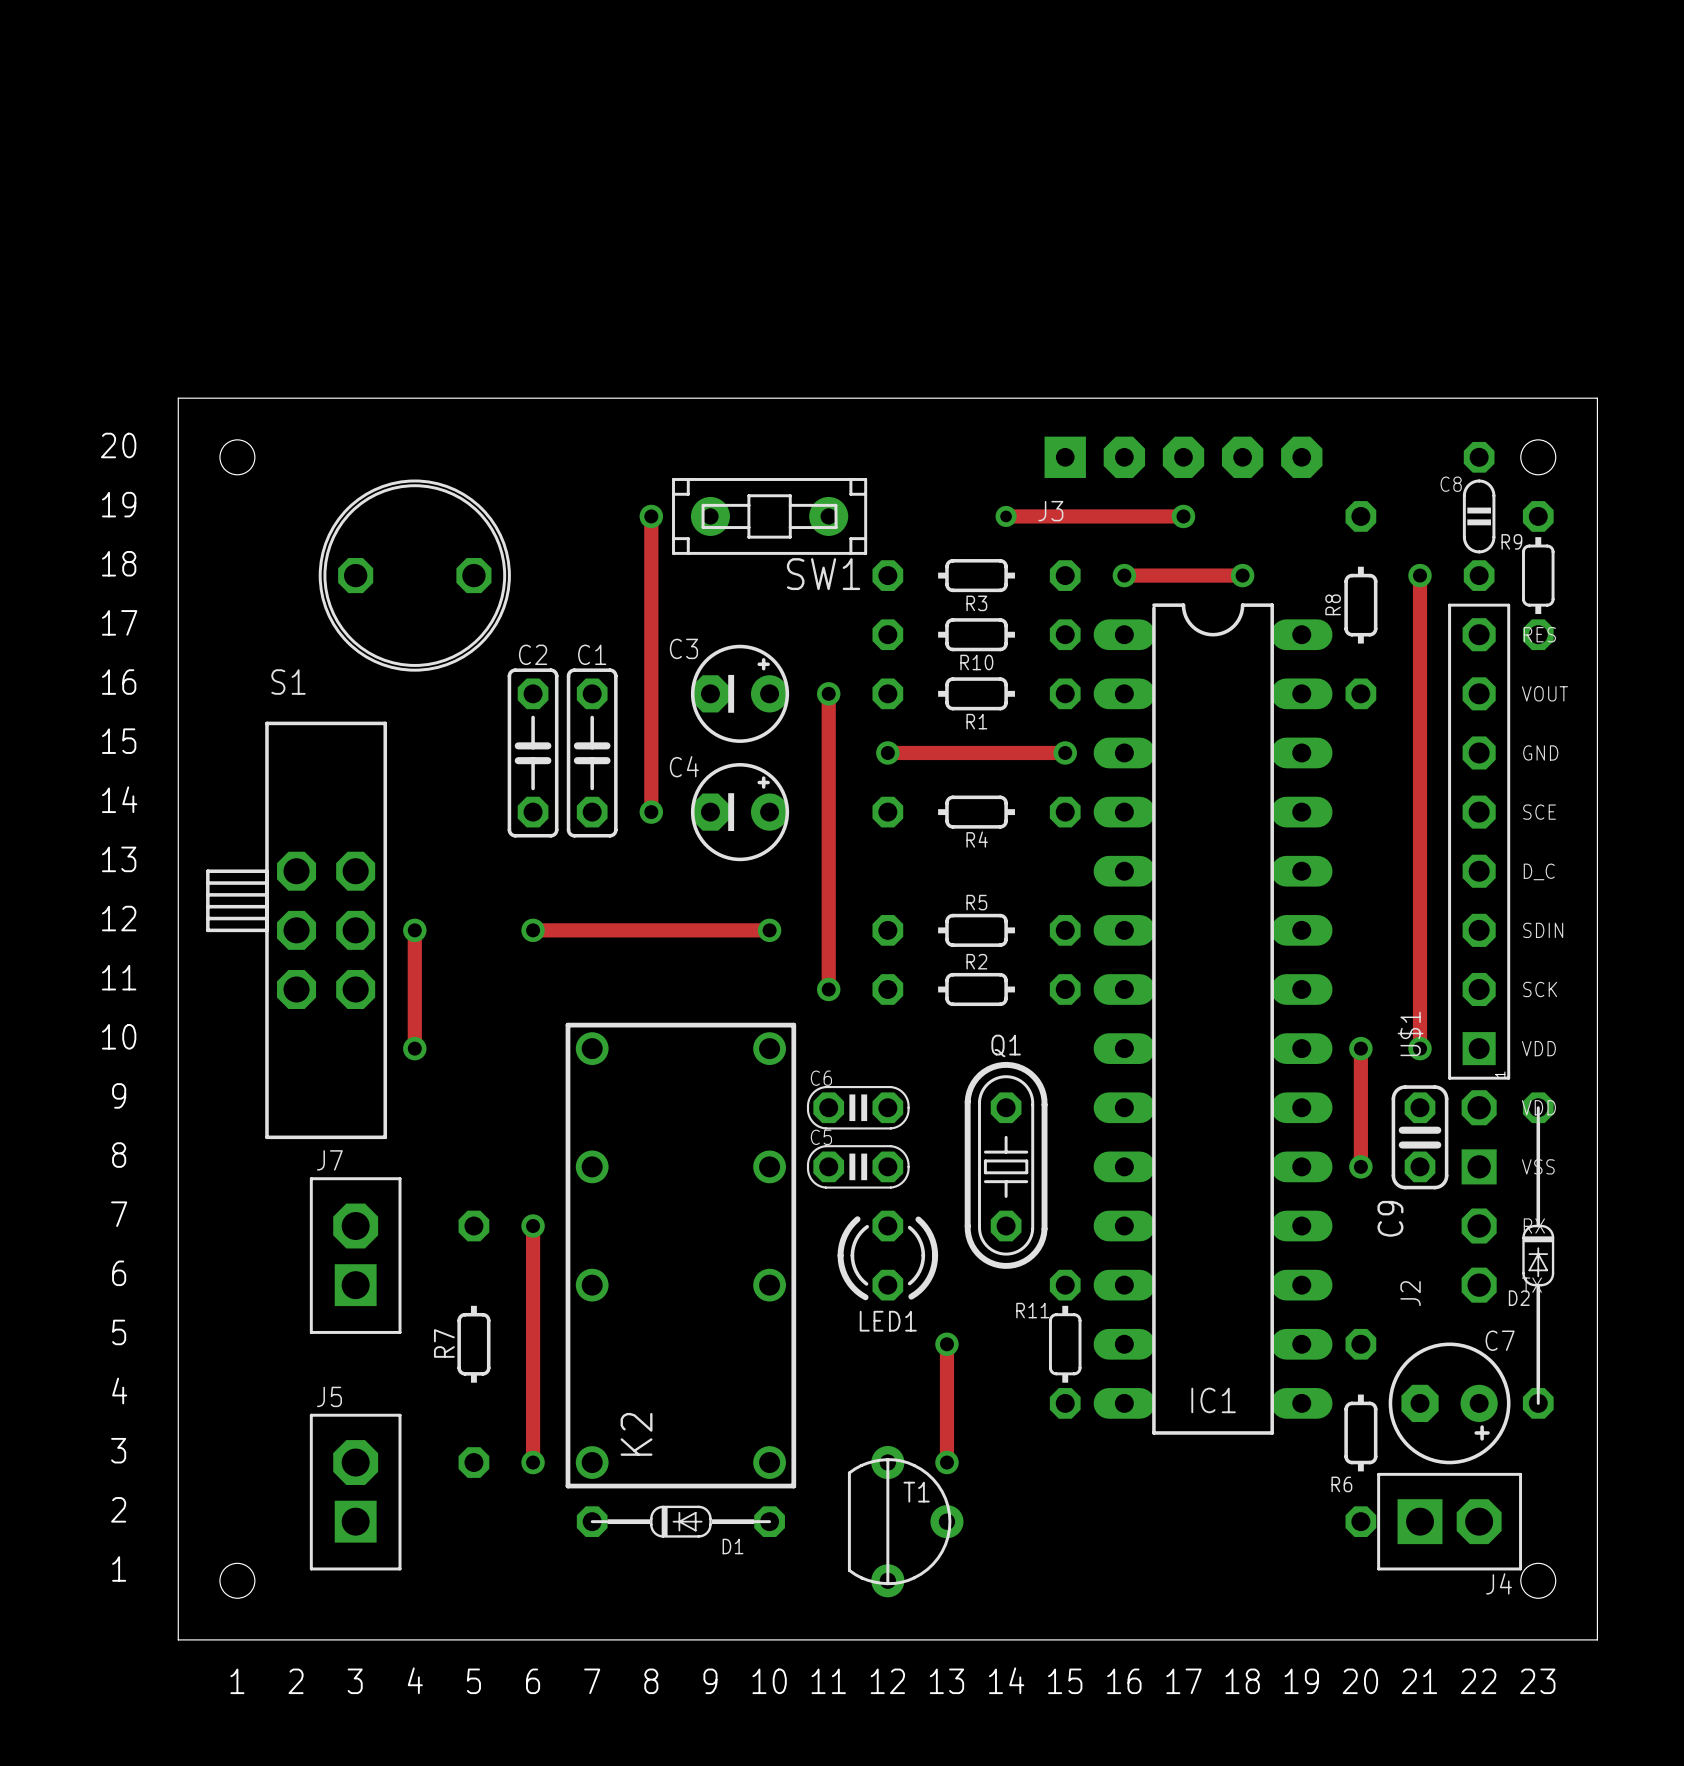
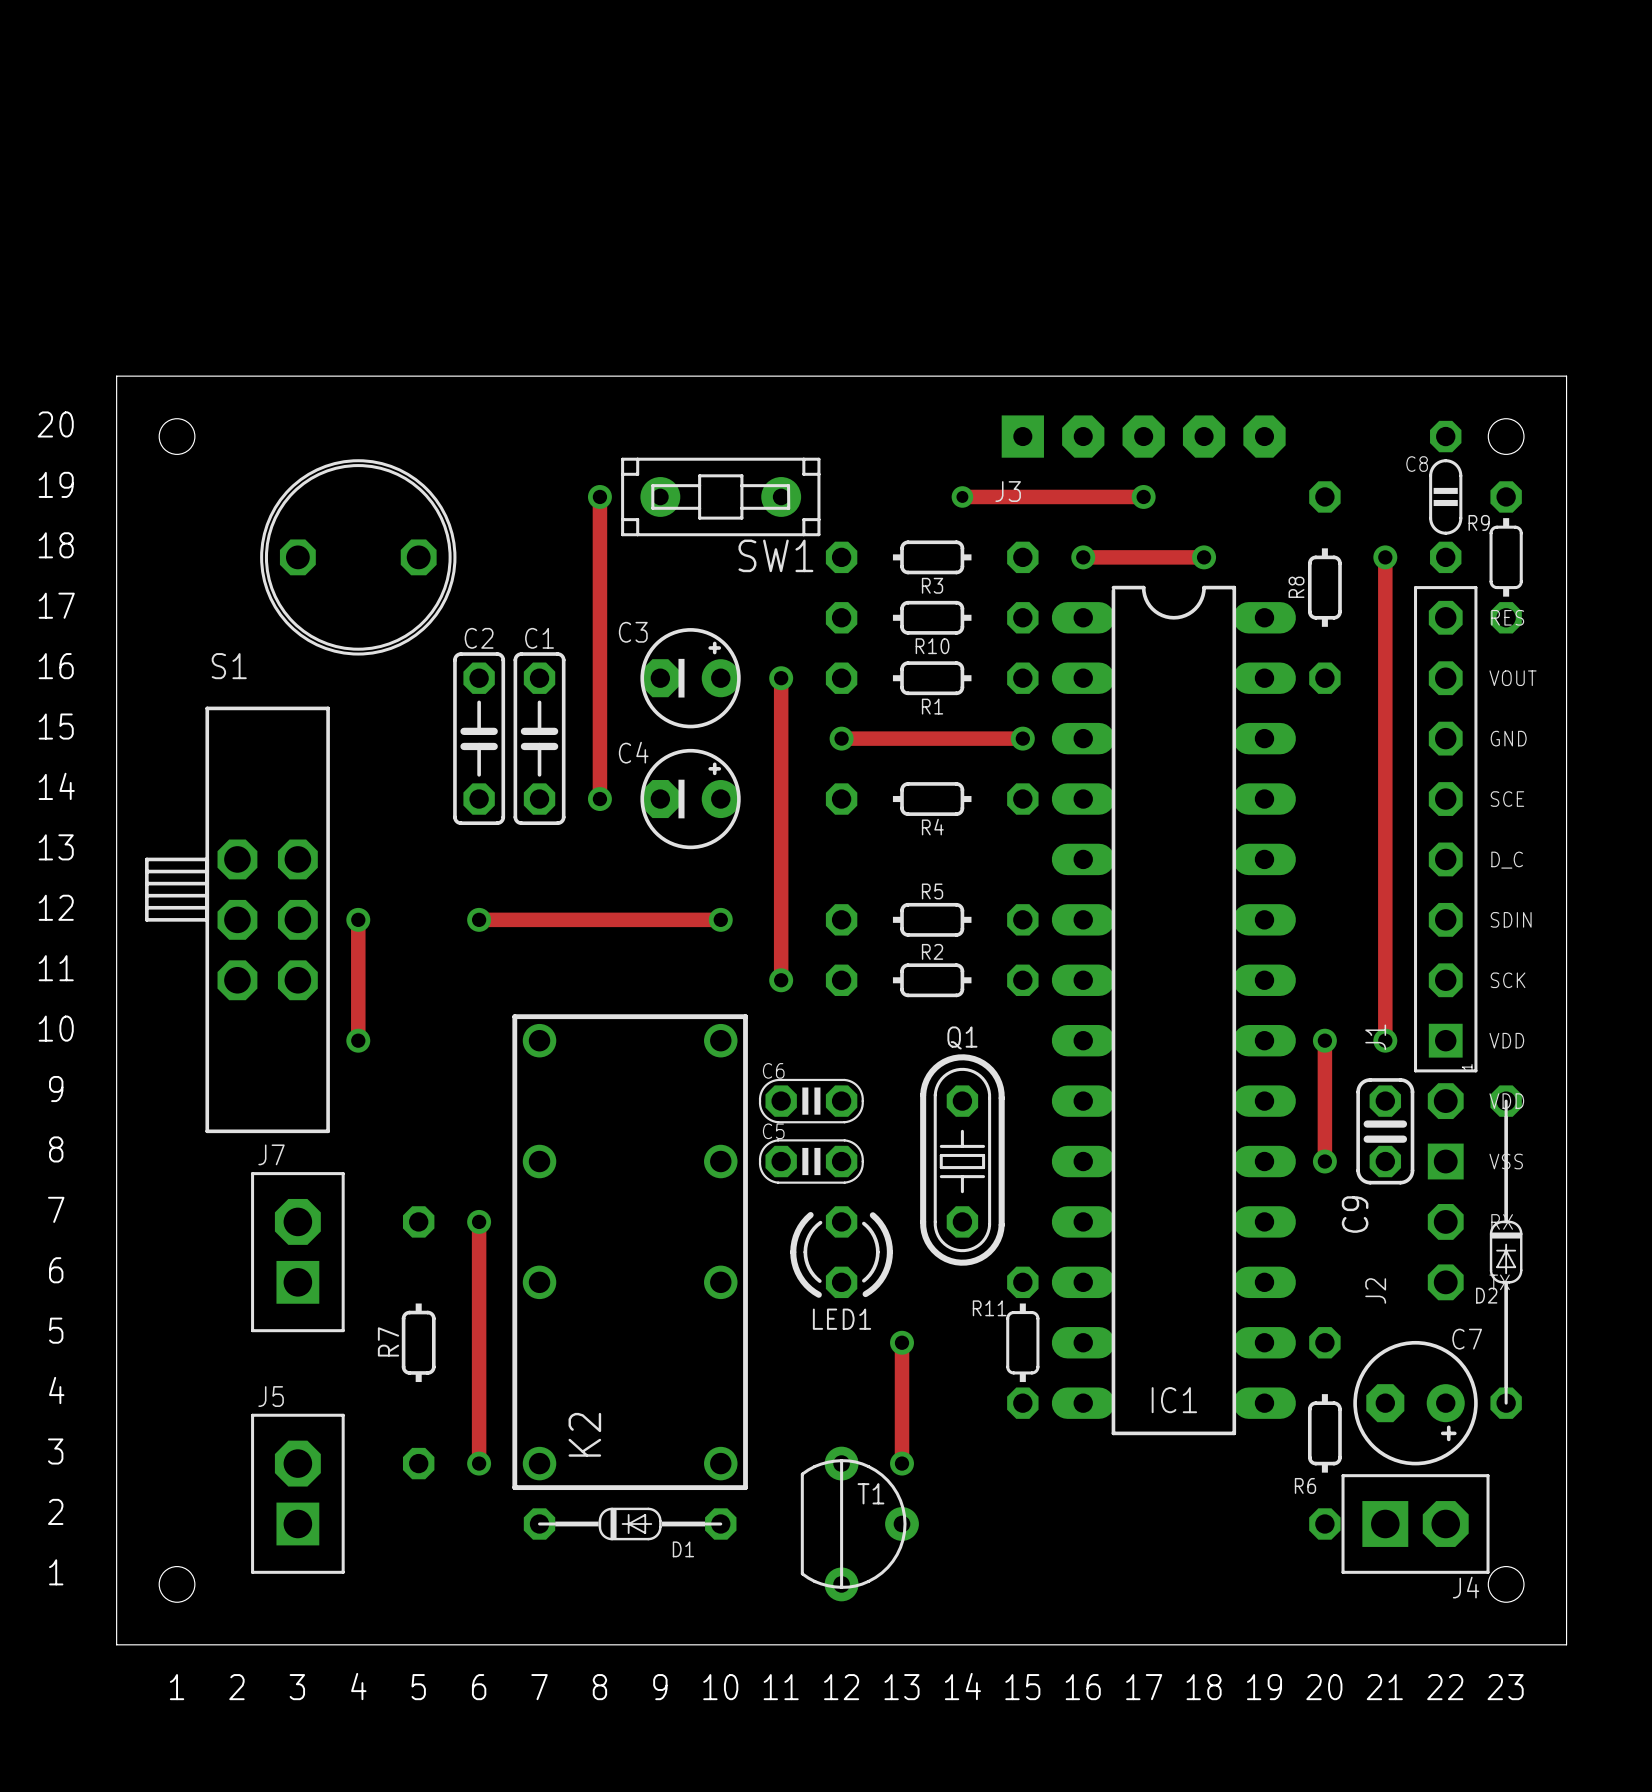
U$1 name: U$1 (1410, 1033) -> J1 (1375, 1037)

